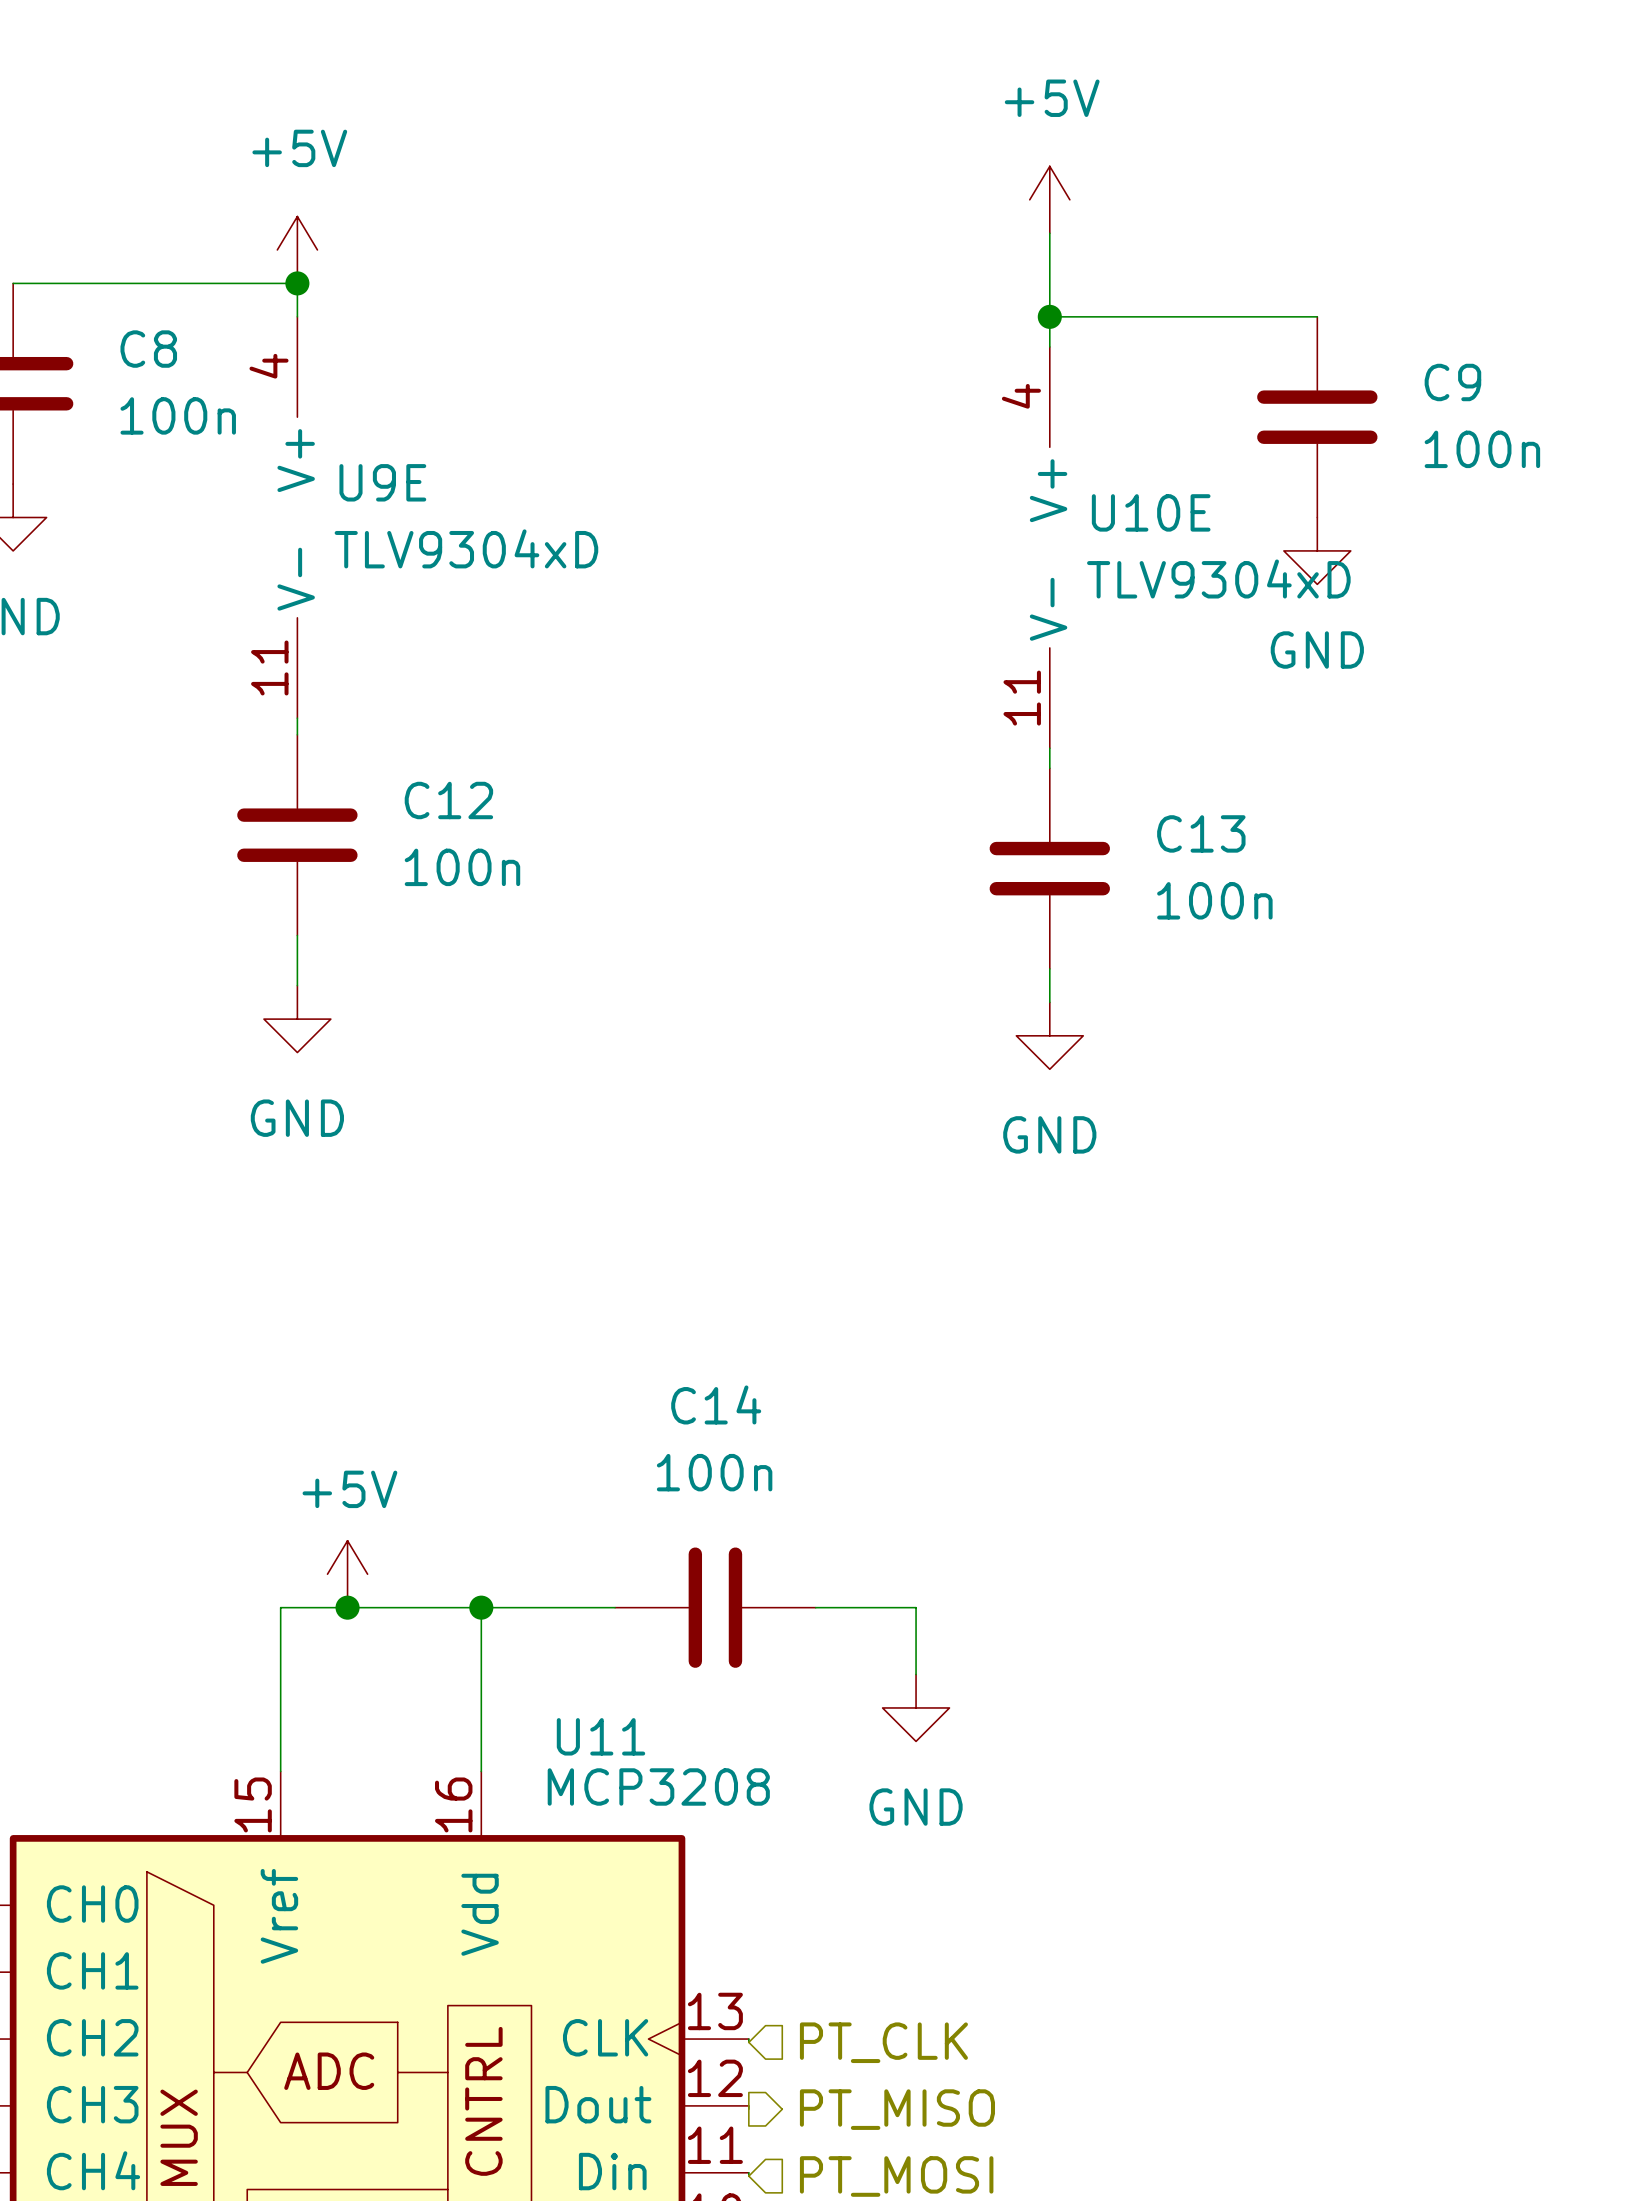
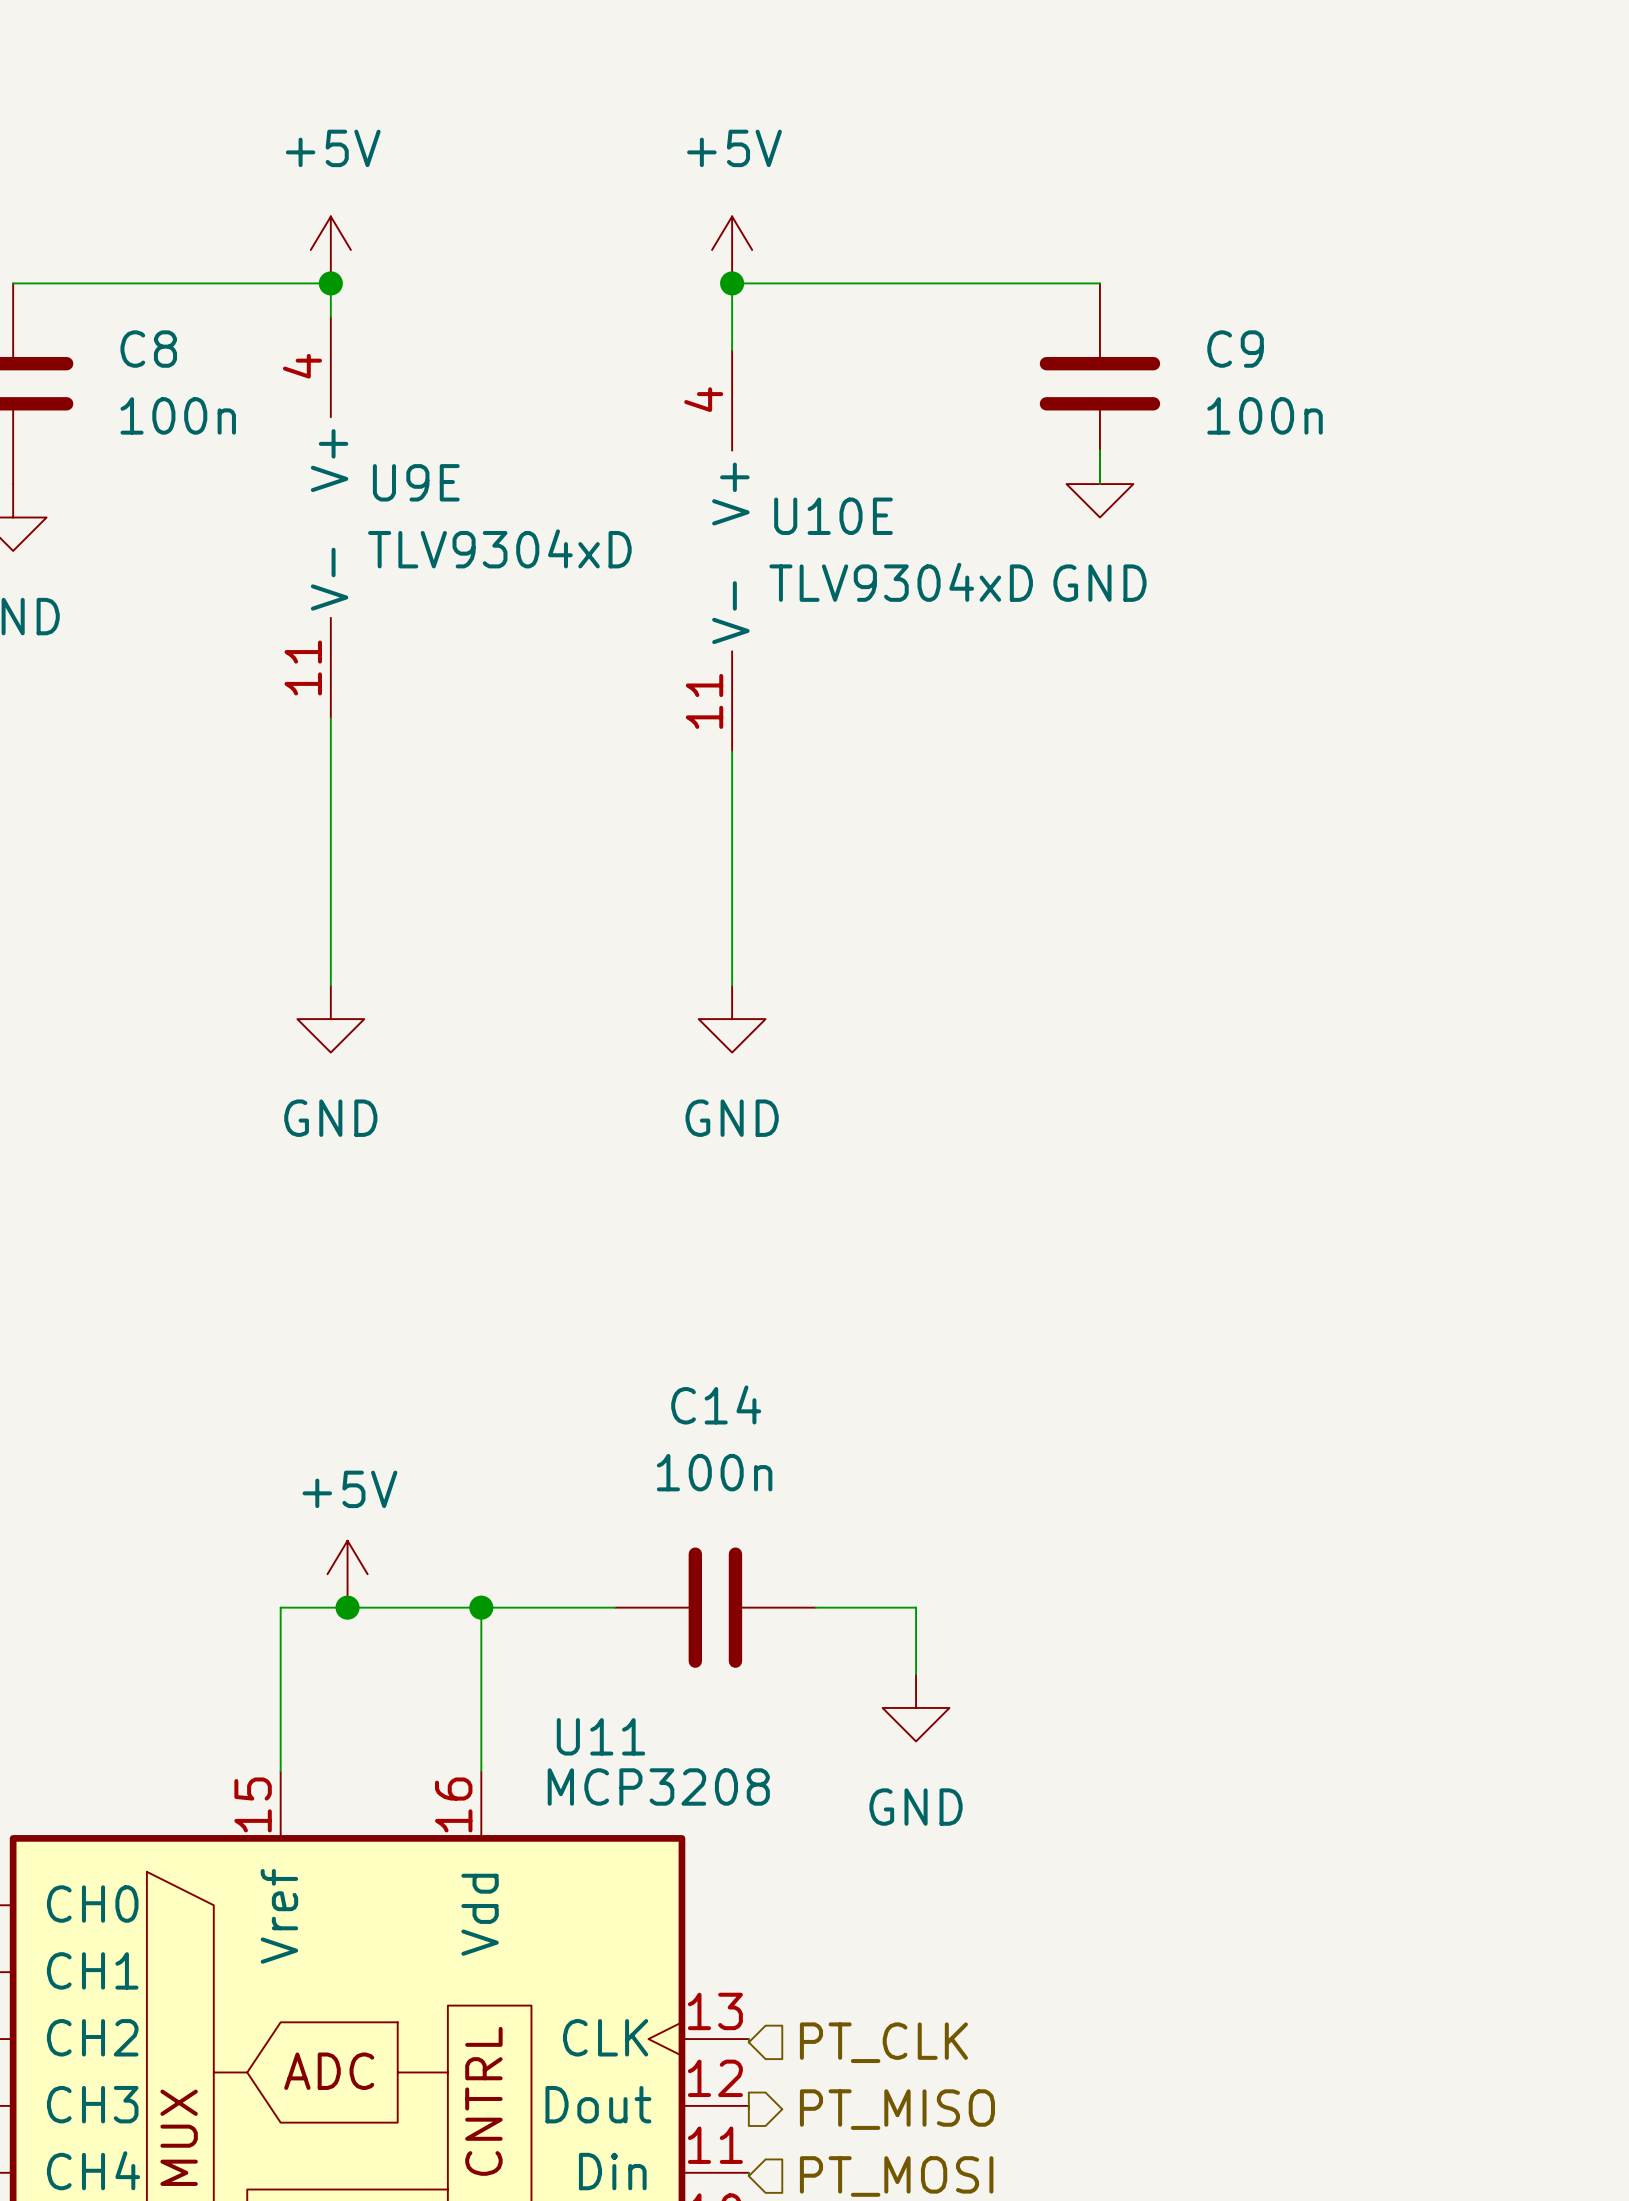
power symbol: +5V (1049, 199) -> none
wire: (1049, 233) (1049, 346) -> none
power symbol position: +5V (297, 249) -> +5V (330, 249)
power symbol: none -> +5V (732, 249)
wire: (297, 283) (297, 316) -> (297, 283) (330, 283) (330, 316)
junction position: (297, 283) -> (330, 283)
junction: none -> (732, 283)
wire: none -> (1099, 283) (732, 283) (732, 350)
wire: (1049, 316) (1317, 316) -> none
junction: (1049, 316) -> none
C9 position: (1317, 417) -> (1099, 383)
U9E position: (297, 517) -> (330, 517)
U10E position: (1049, 547) -> (732, 550)
power symbol position: GND (1317, 550) -> GND (1099, 484)
wire: (297, 718) (297, 734) -> none
wire: none -> (330, 718) (330, 985)
wire: (1049, 748) (1049, 768) -> none
wire: none -> (732, 751) (732, 985)
C12: 100n (297, 835) -> none
C13: 100n (1049, 868) -> none
wire: (297, 935) (297, 985) -> none
wire: (1049, 968) (1049, 1002) -> (1099, 450) (1099, 484)
power symbol position: GND (297, 1019) -> GND (330, 1019)
power symbol: none -> GND (732, 1019)
power symbol: GND (1049, 1035) -> none

